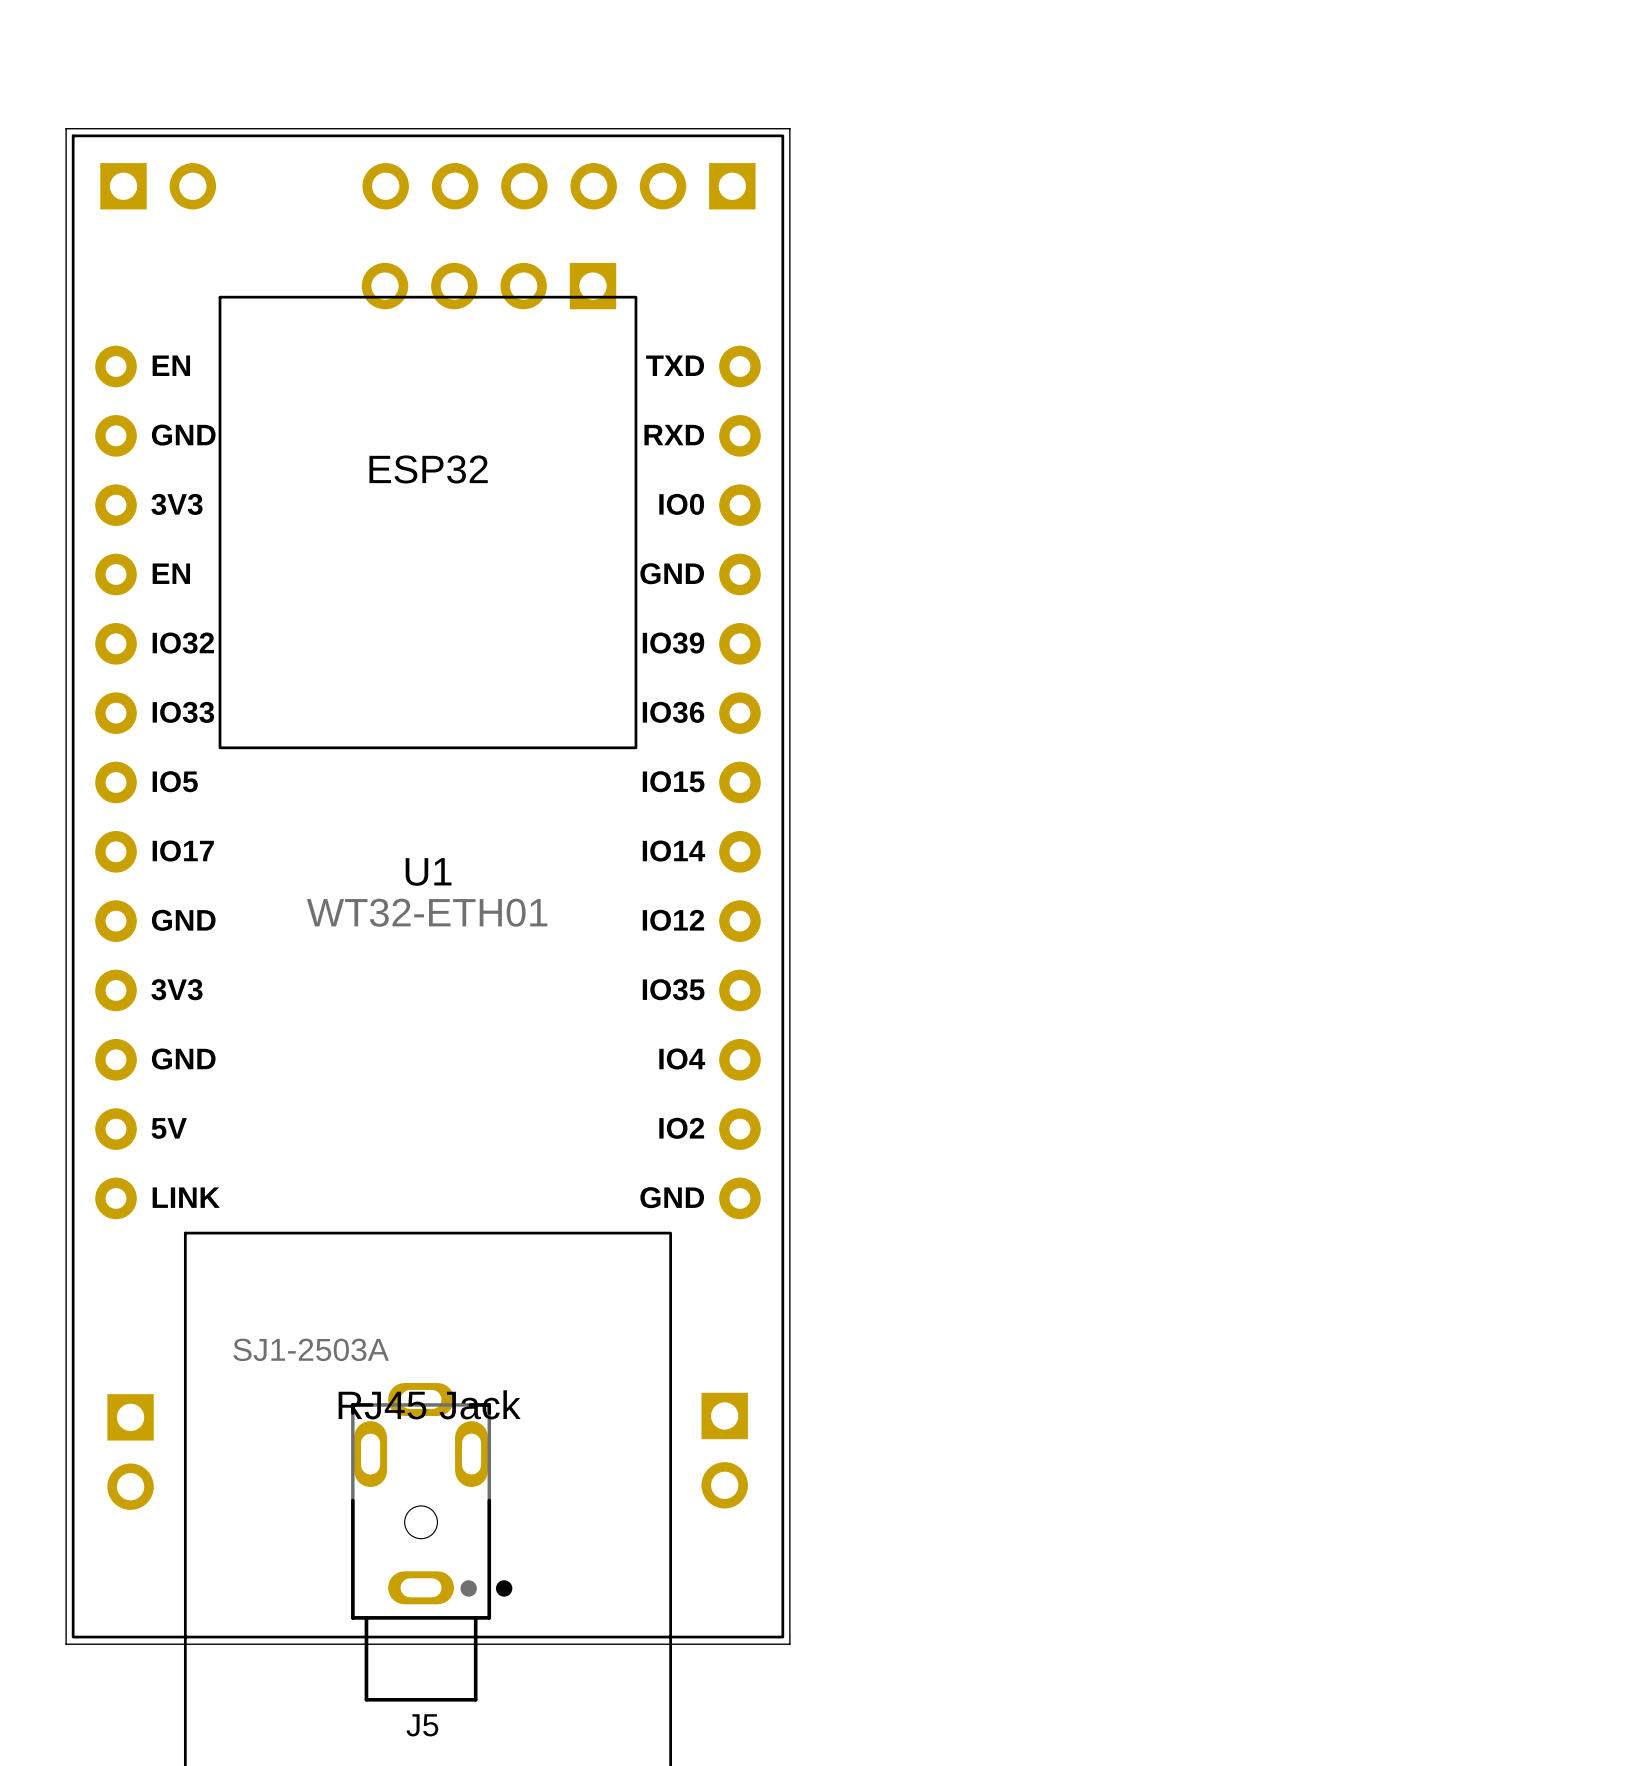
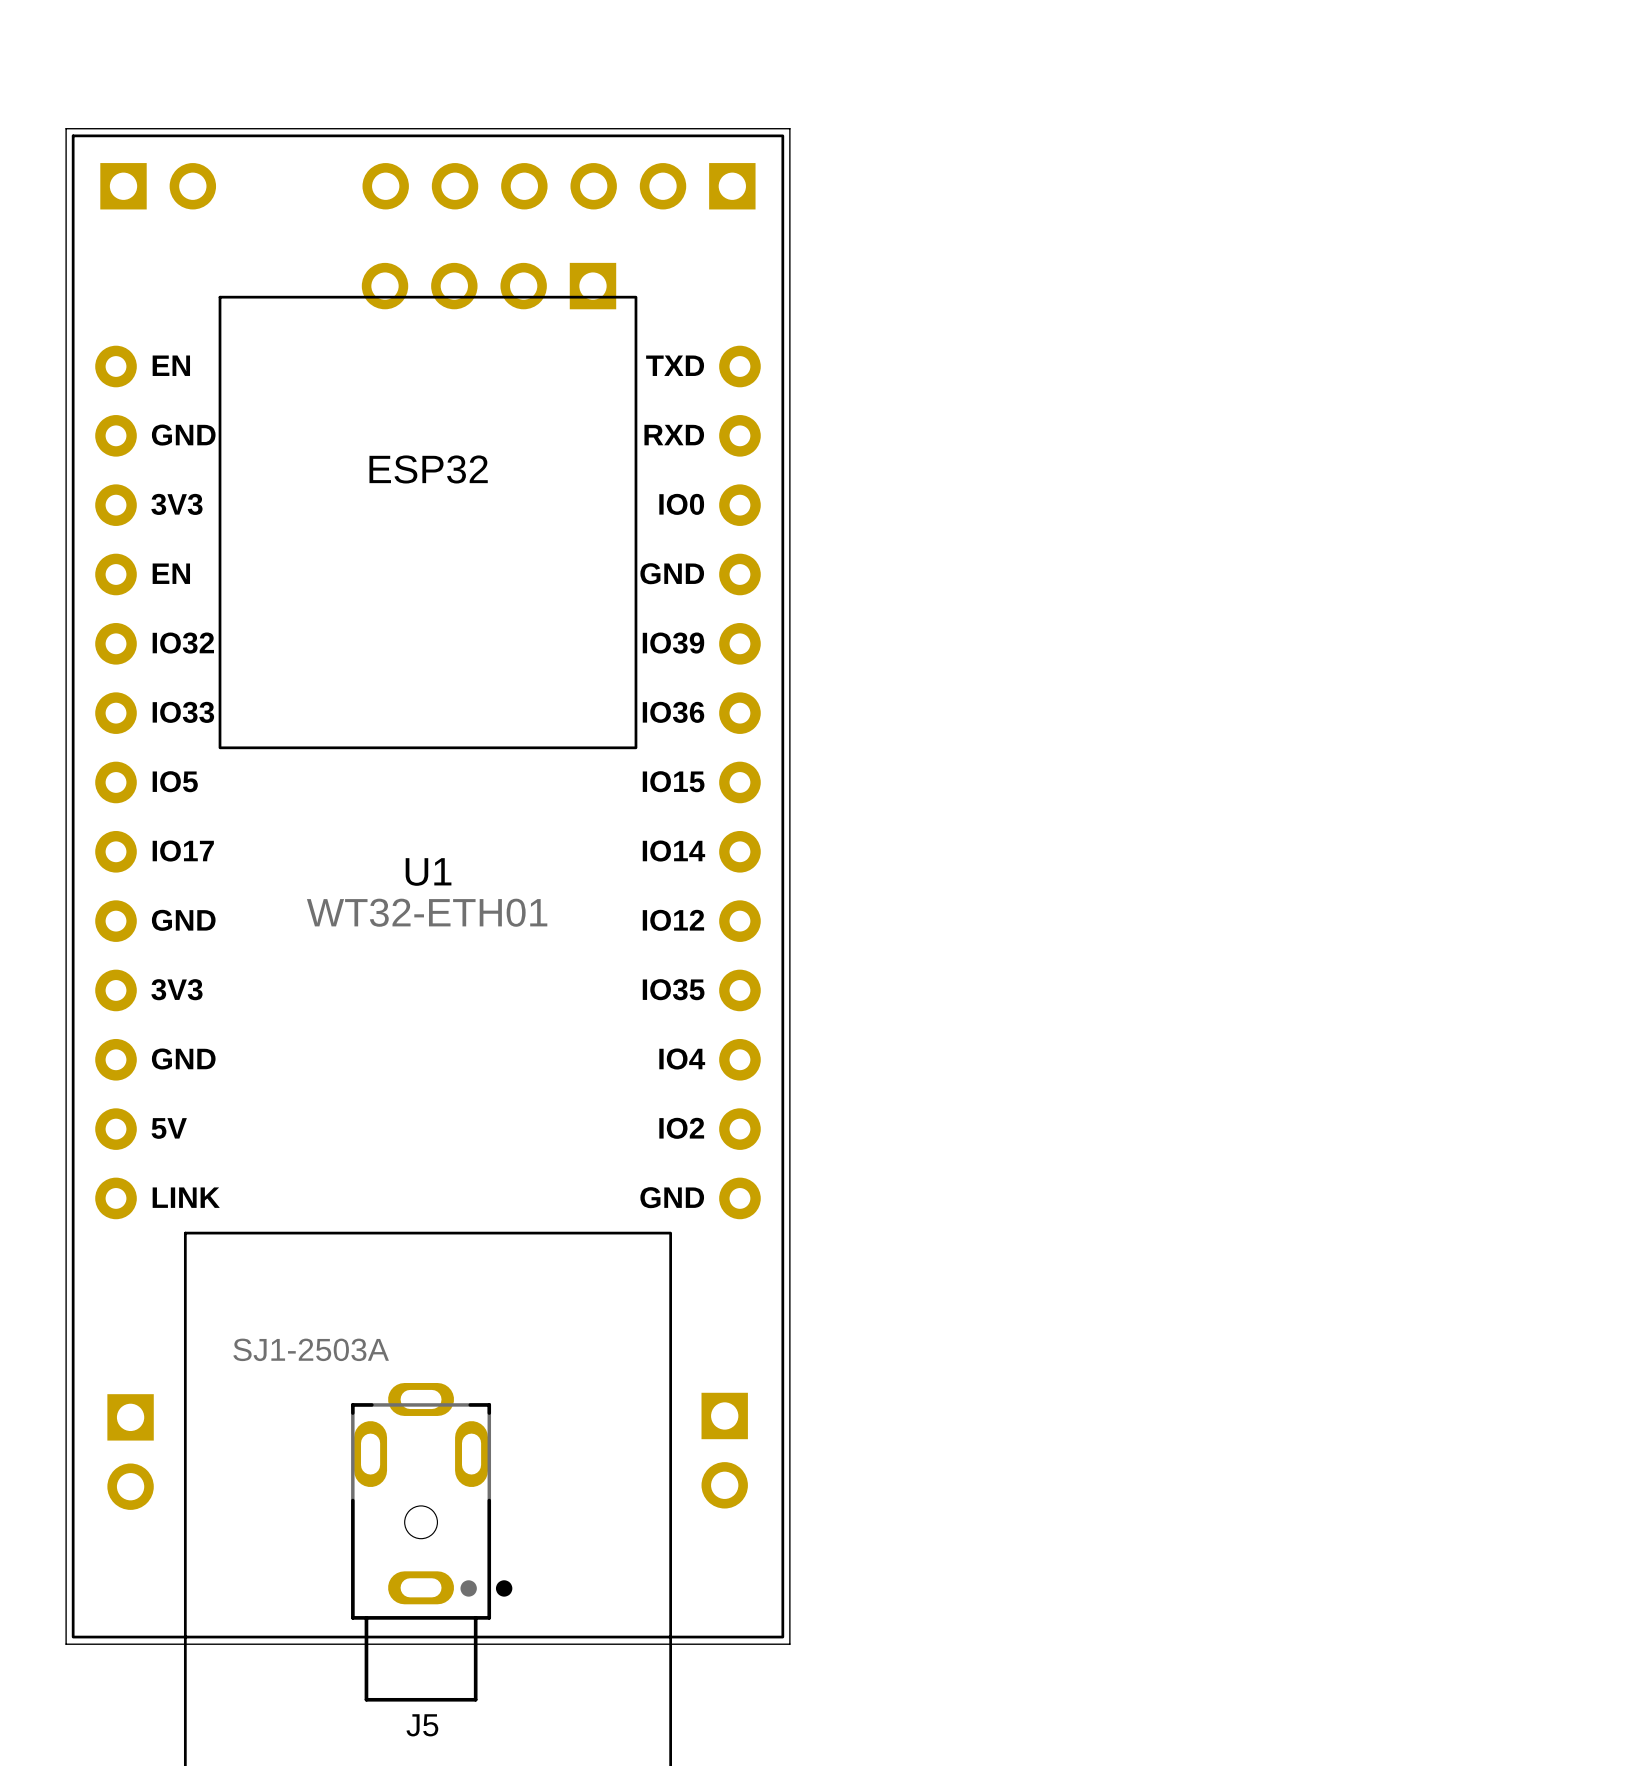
U1 text: RJ45 Jack (429, 1404) -> none

